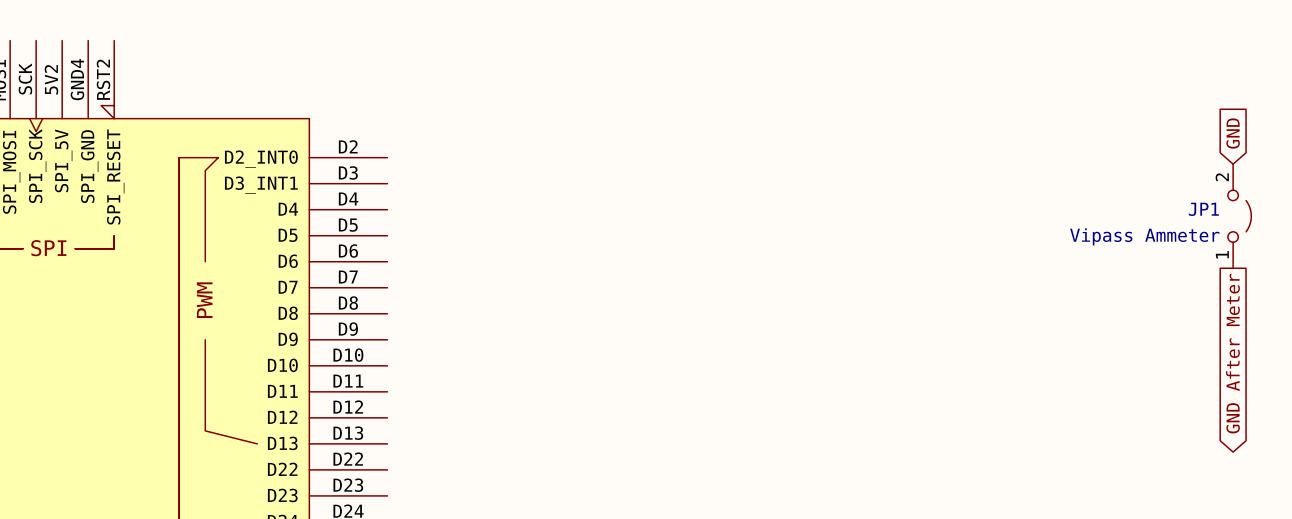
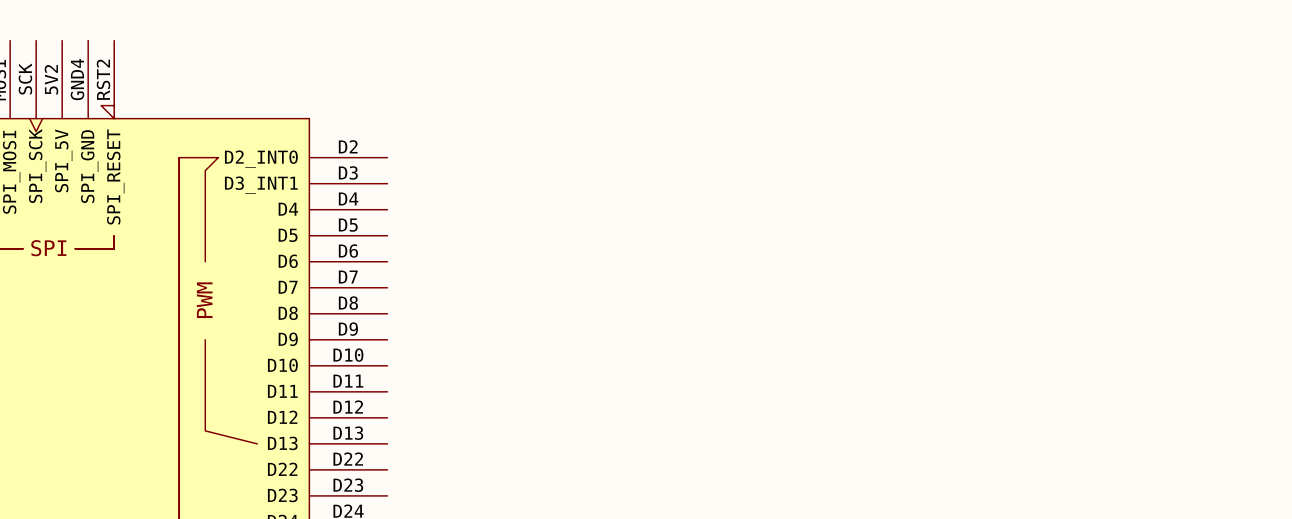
global label: GND (1233, 133) -> none
JP1: Vipass Ammeter (1239, 216) -> none
global label: GND After Meter (1232, 353) -> none

